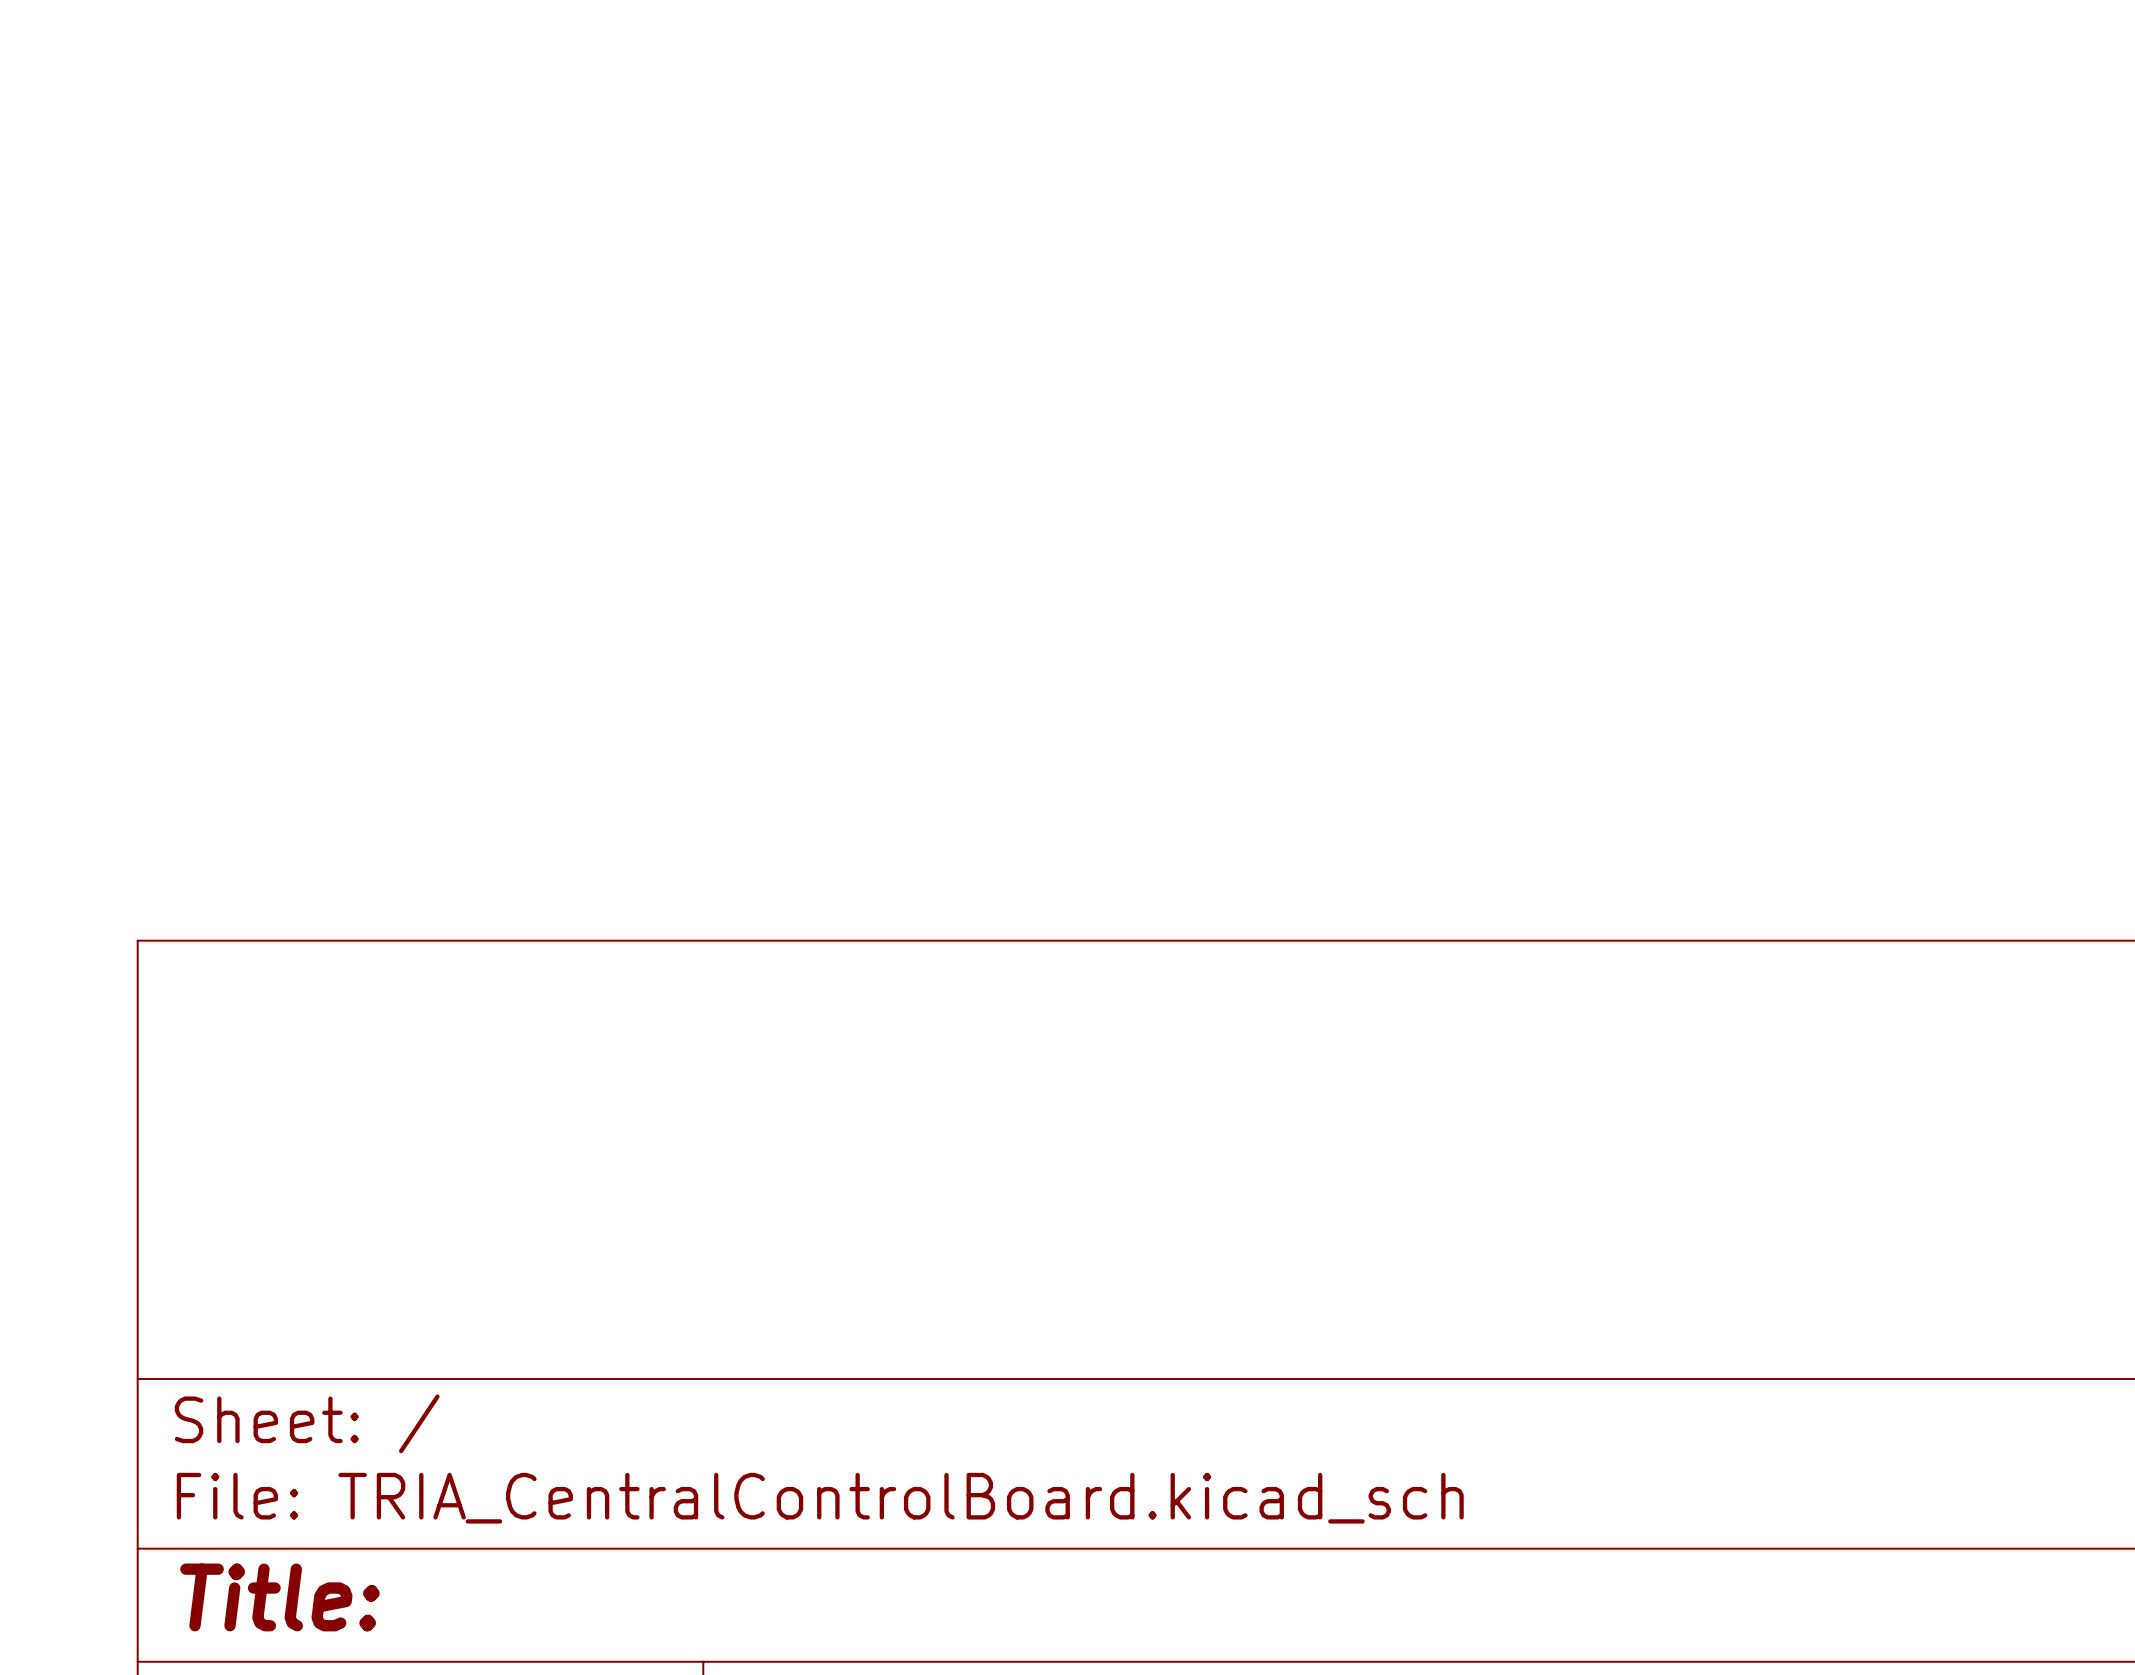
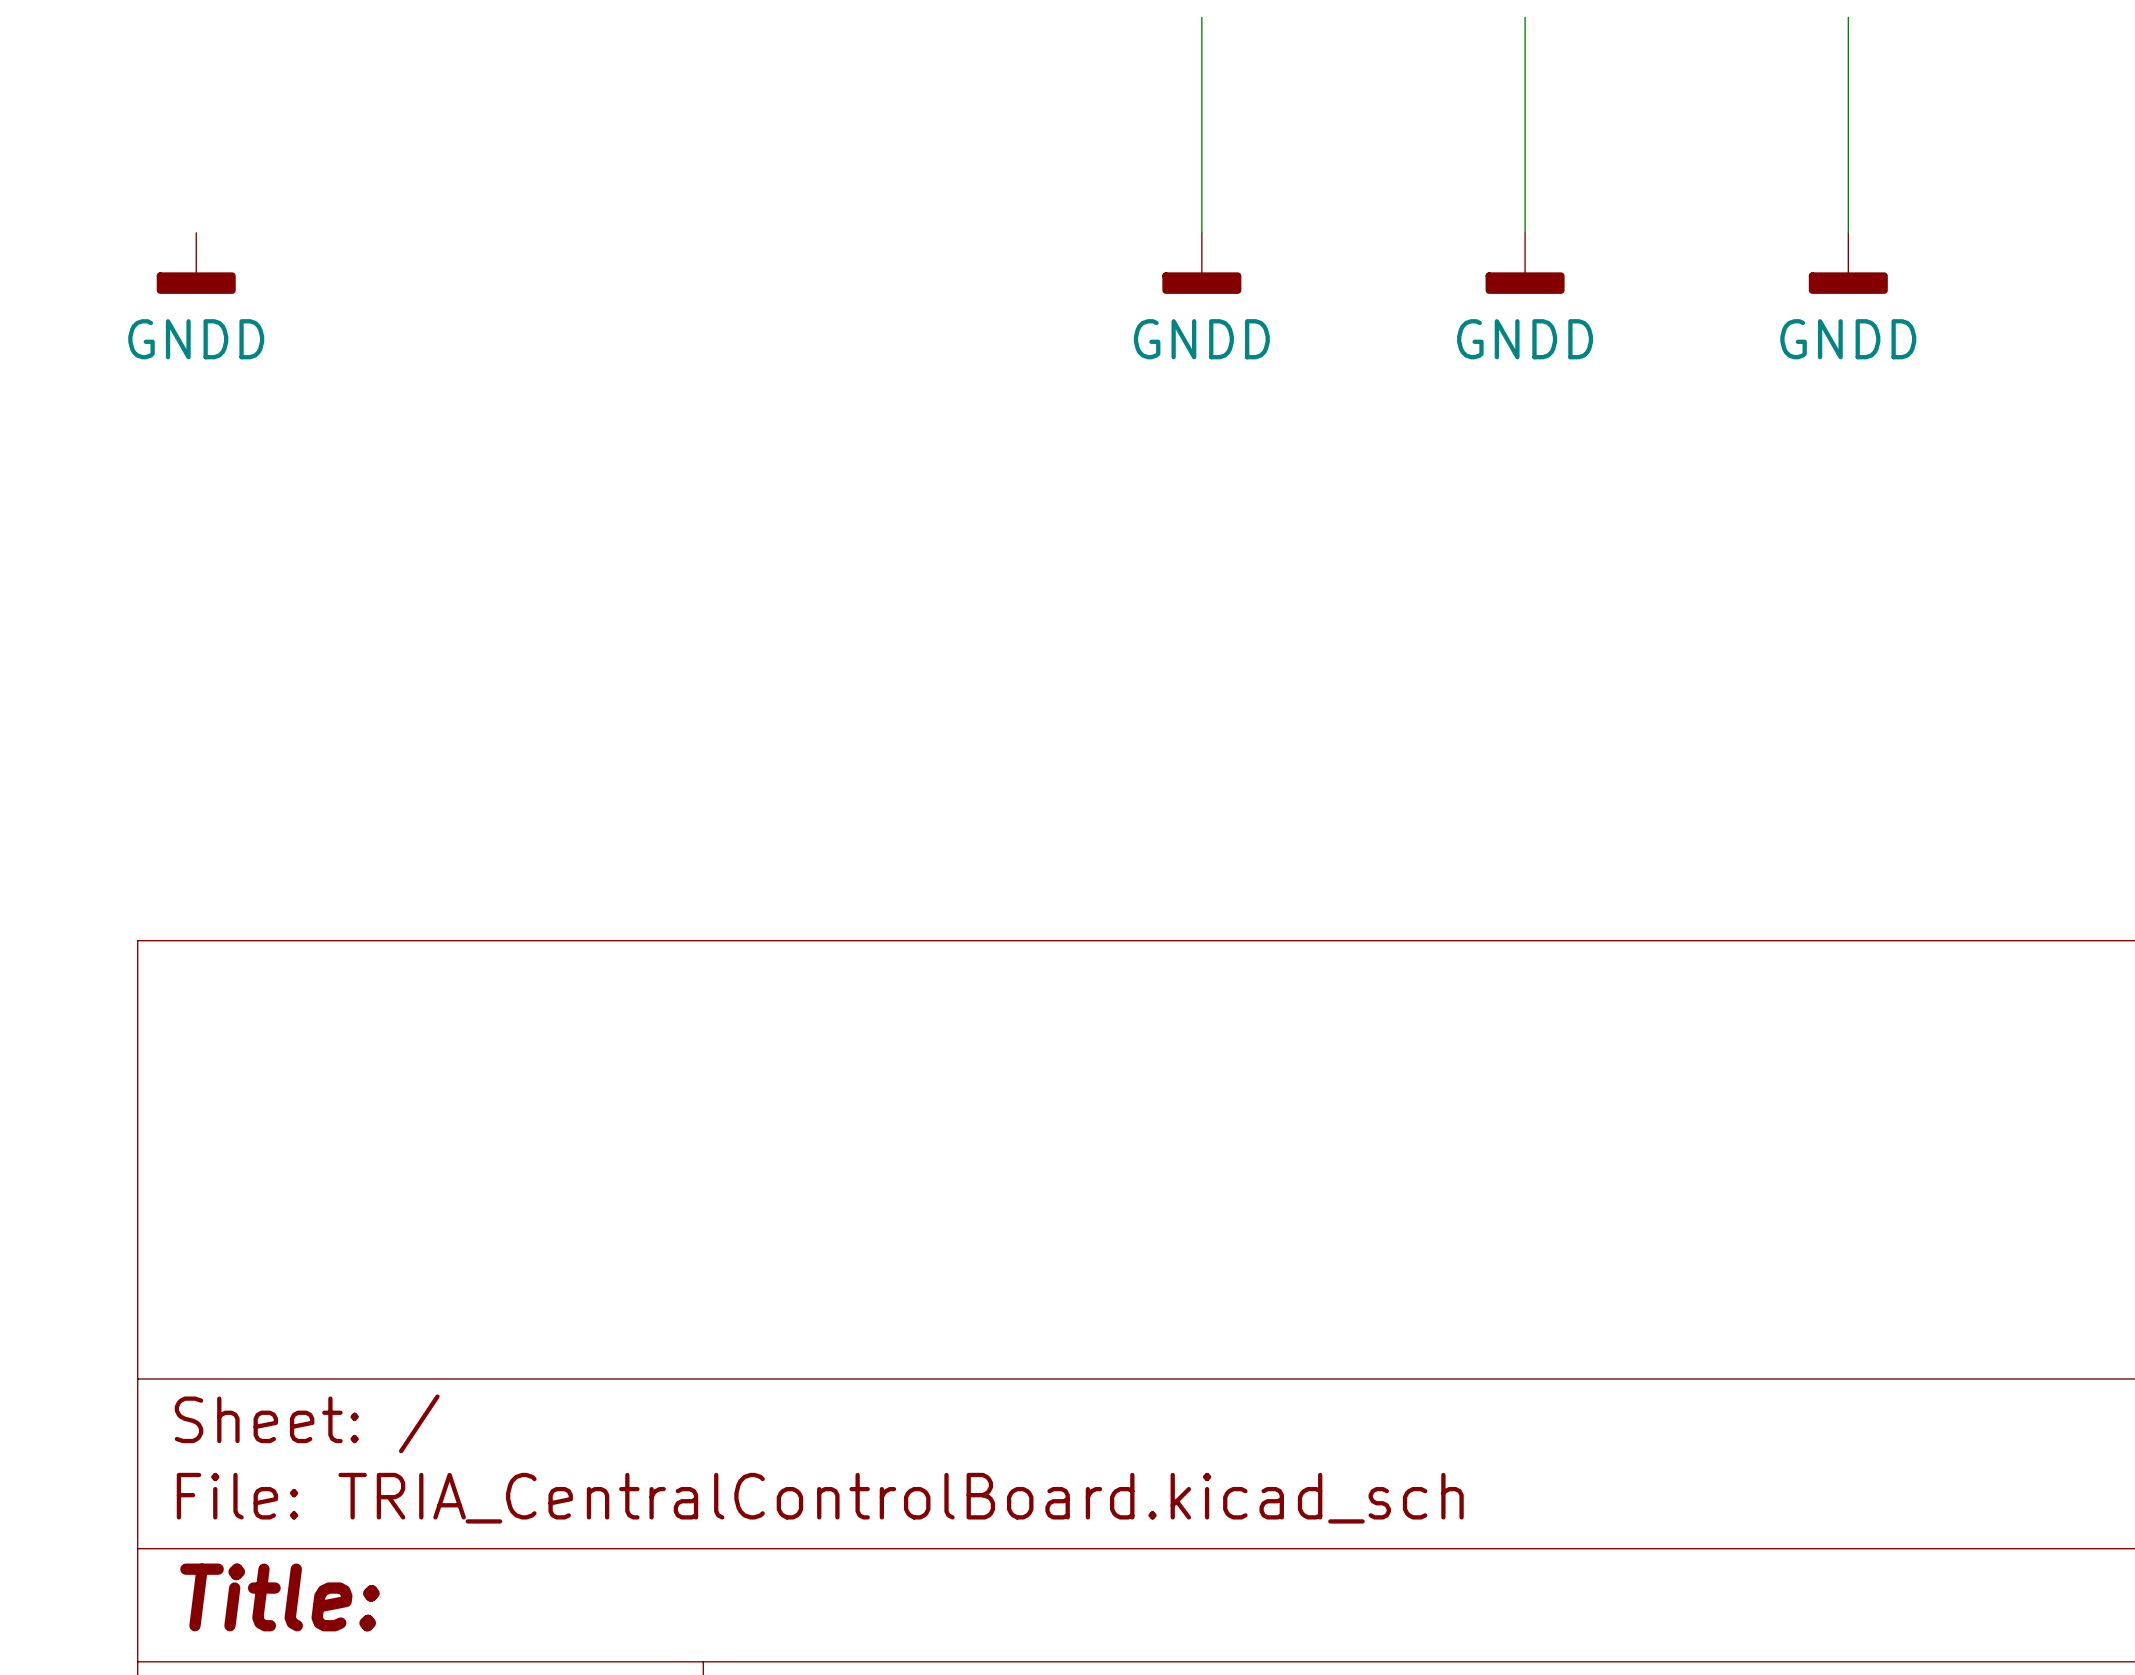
wire: none -> (1201, 17) (1201, 232)
wire: none -> (1525, 17) (1525, 232)
wire: none -> (1848, 17) (1848, 232)
power symbol: none -> GNDD (196, 263)
power symbol: none -> GNDD (1201, 263)
power symbol: none -> GNDD (1525, 263)
power symbol: none -> GNDD (1848, 263)

